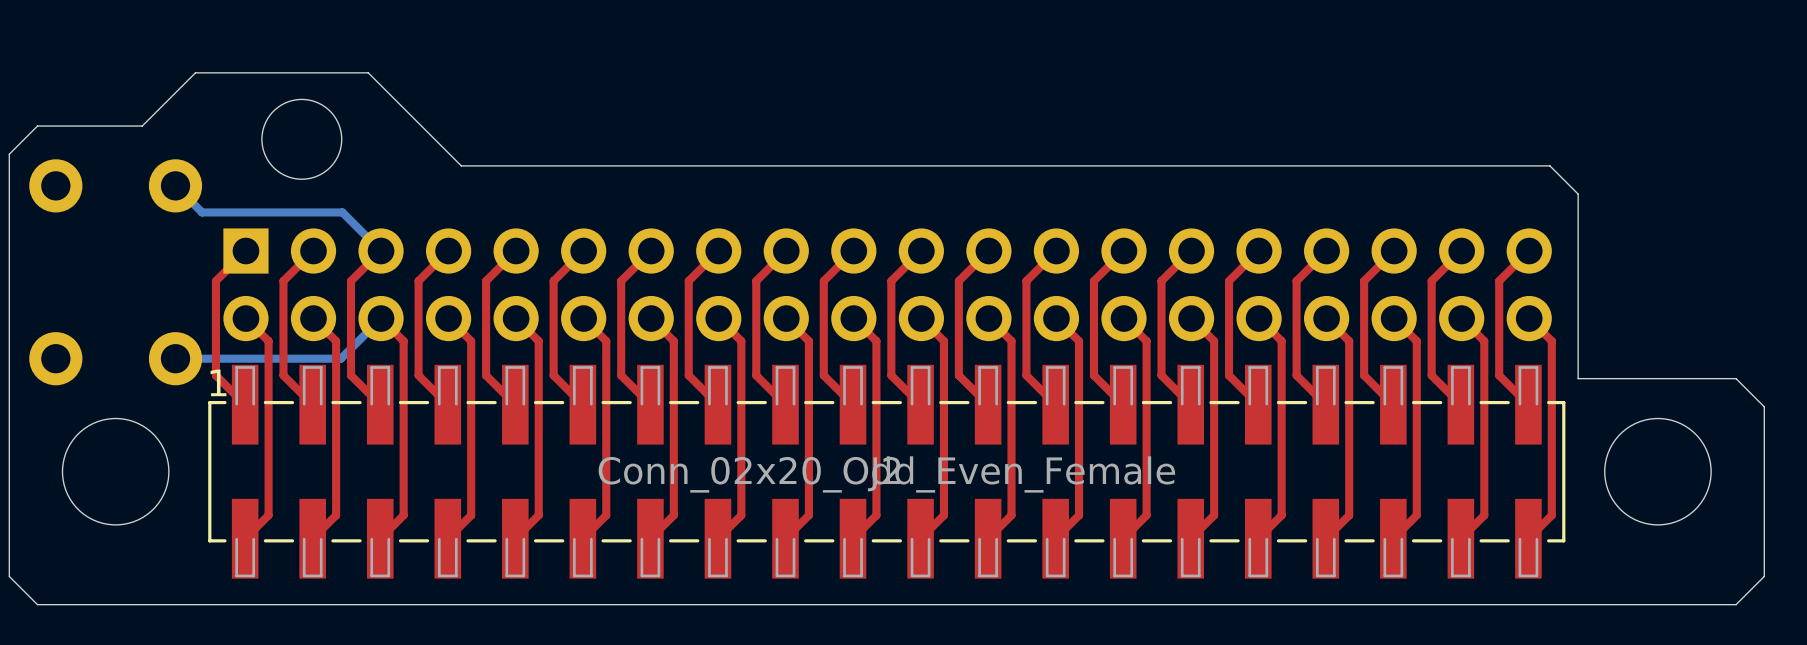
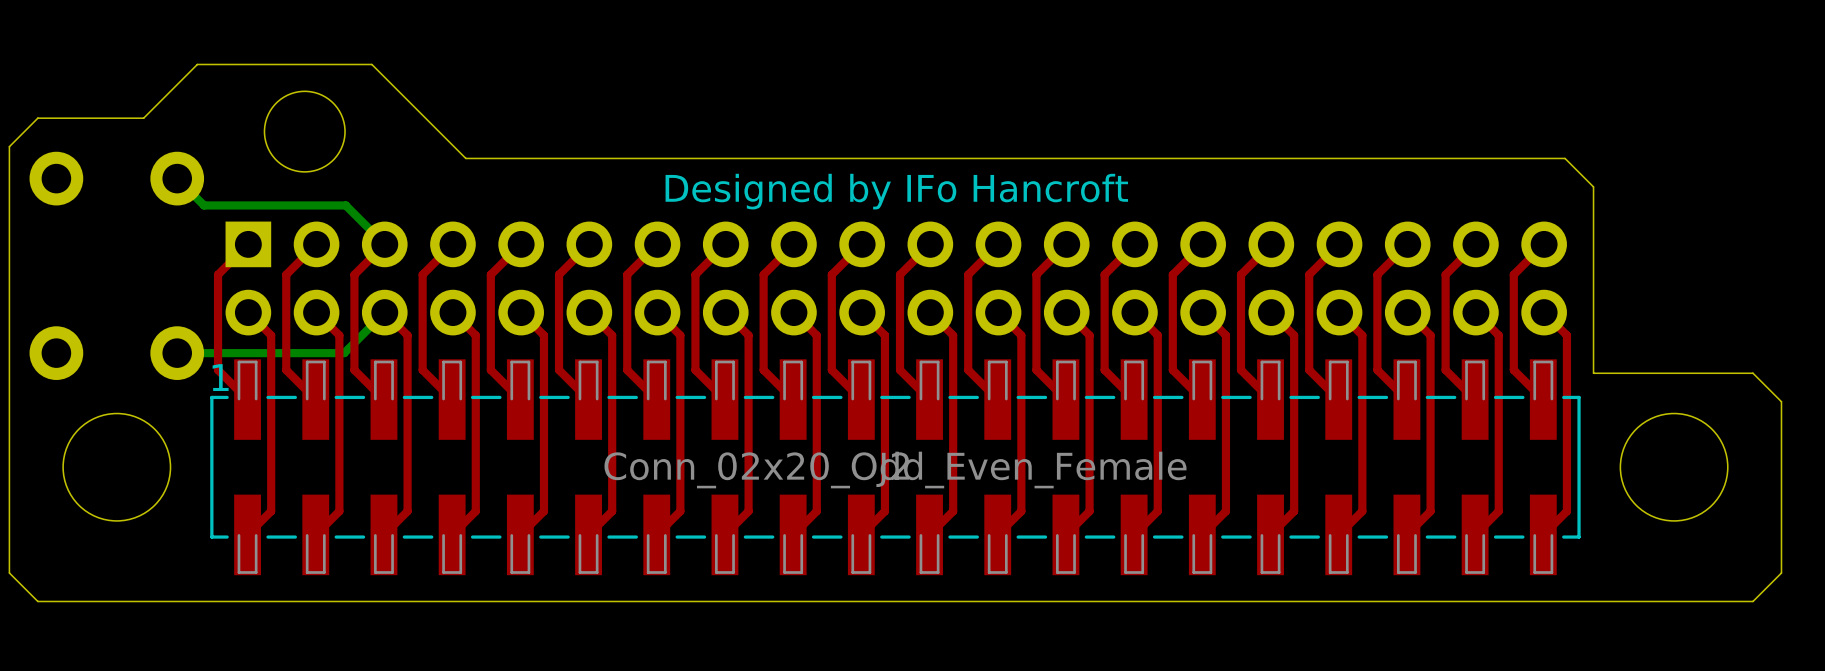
text: none -> Designed by IFo Hancroft (896, 191)

